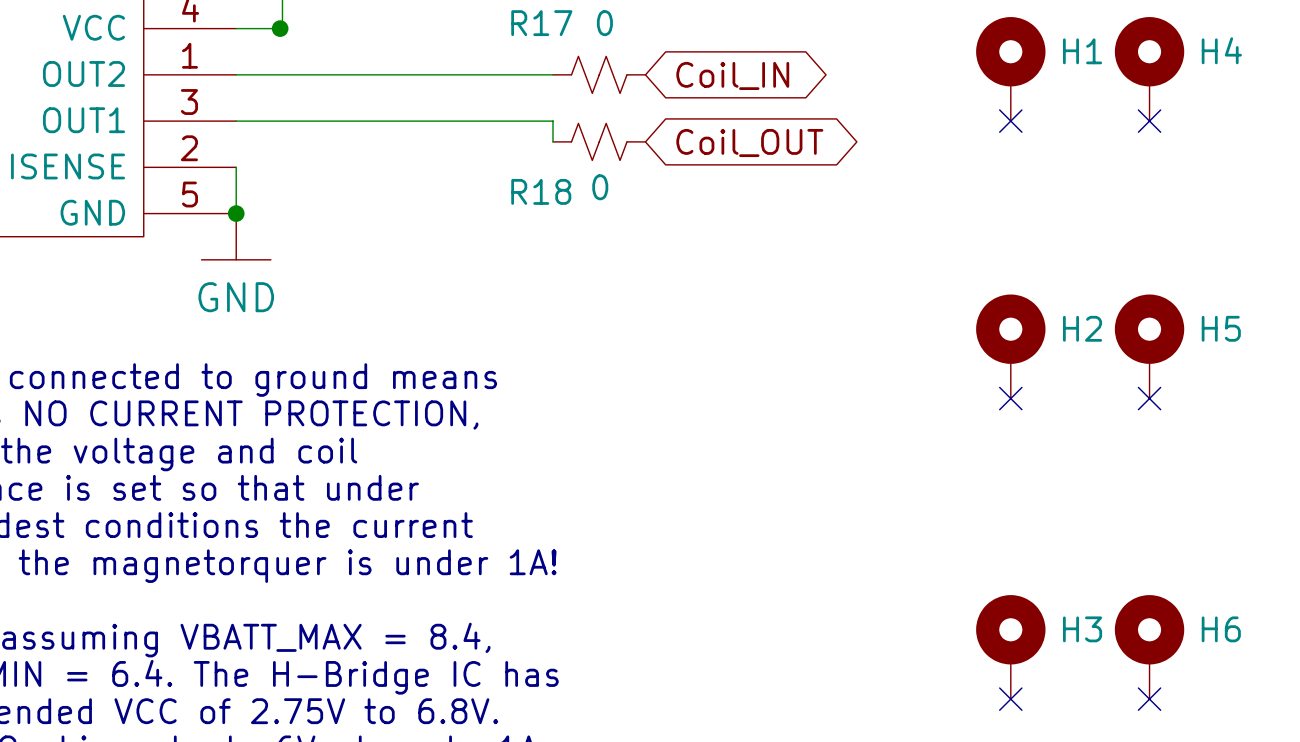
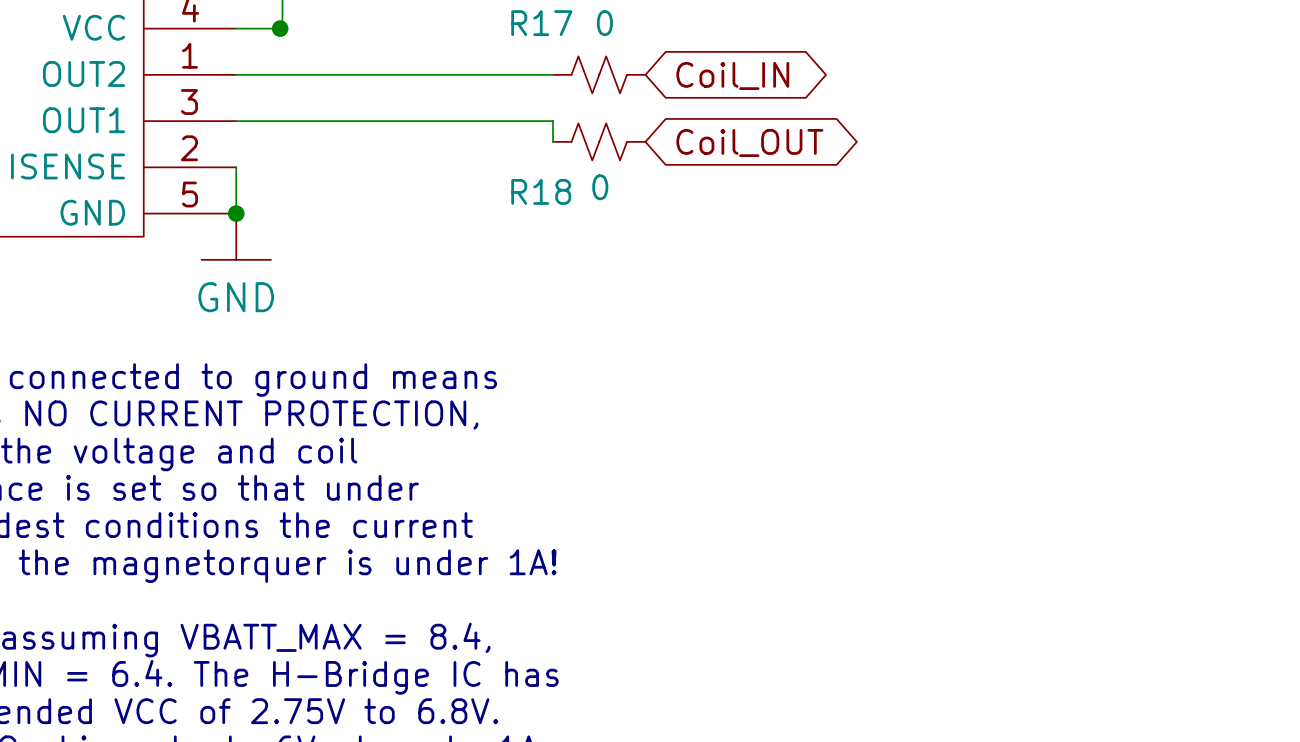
H1: (1010, 69) -> none
H4: (1149, 69) -> none
no-connect mark: (1010, 121) -> none
no-connect mark: (1149, 121) -> none
H2: (1010, 346) -> none
H5: (1149, 346) -> none
no-connect mark: (1010, 398) -> none
no-connect mark: (1149, 398) -> none
H3: (1010, 647) -> none
H6: (1149, 647) -> none
no-connect mark: (1010, 699) -> none
no-connect mark: (1149, 699) -> none

